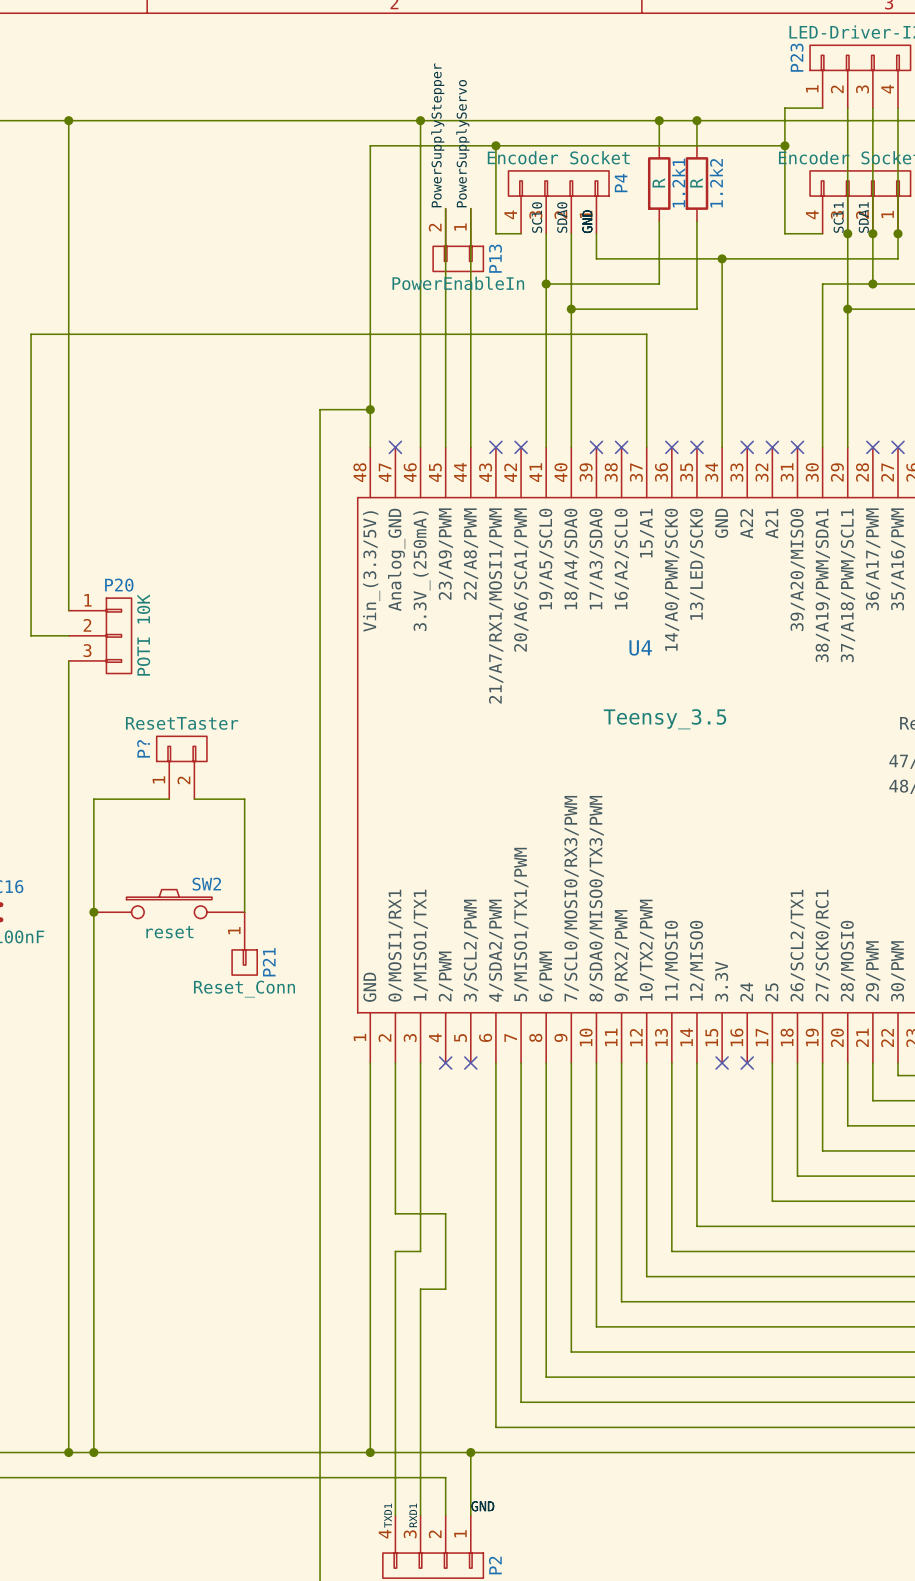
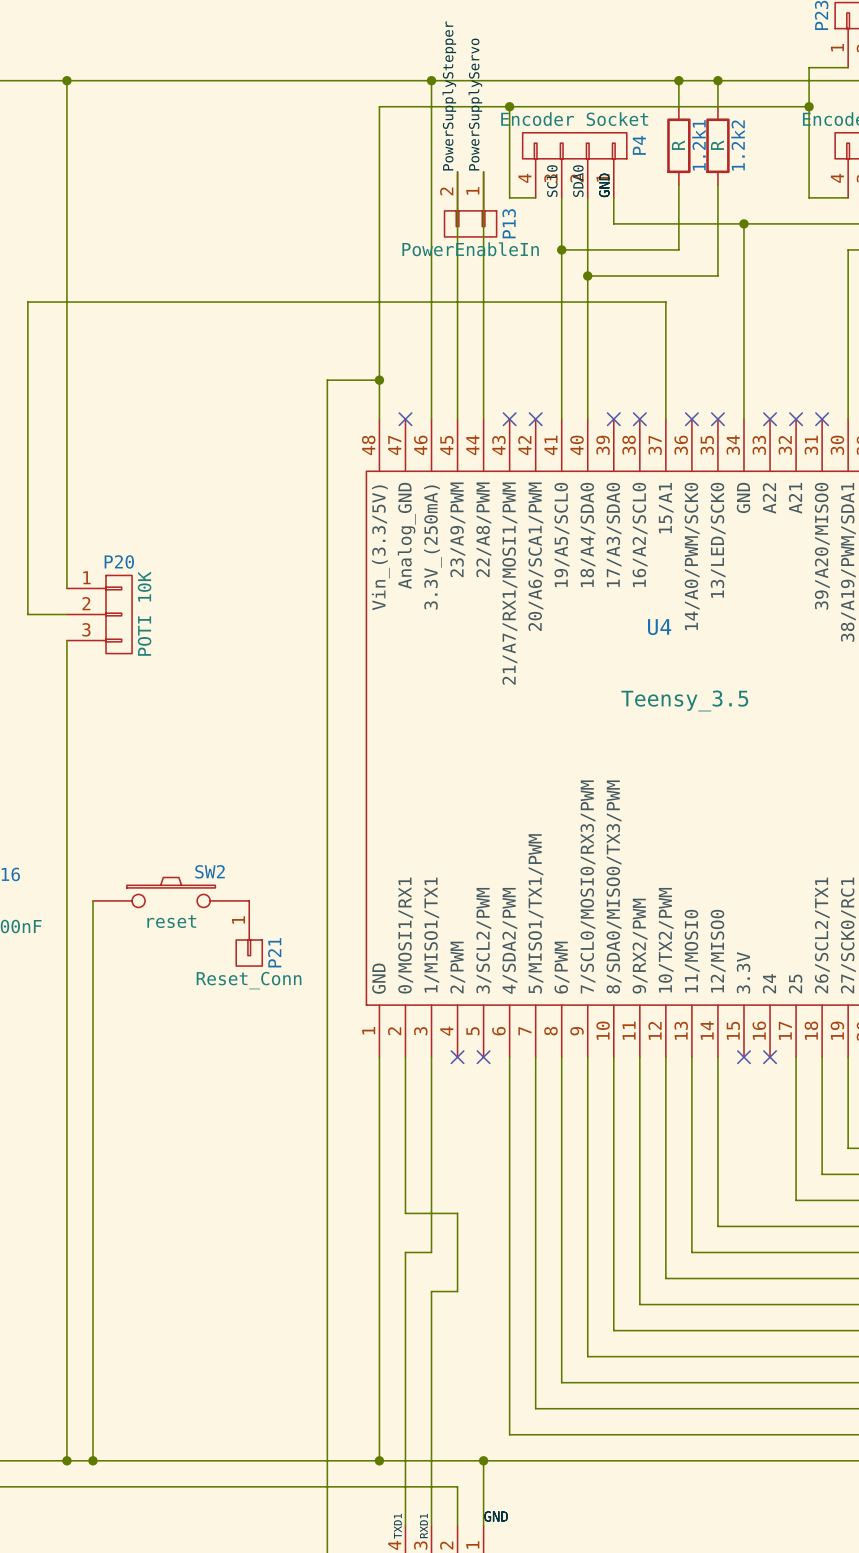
P?: ResetTaster (181, 767) -> none
wire: (169, 799) (93, 799) (93, 912) -> none
wire: (194, 799) (244, 799) (244, 912) -> none
junction: (93, 912) -> none

